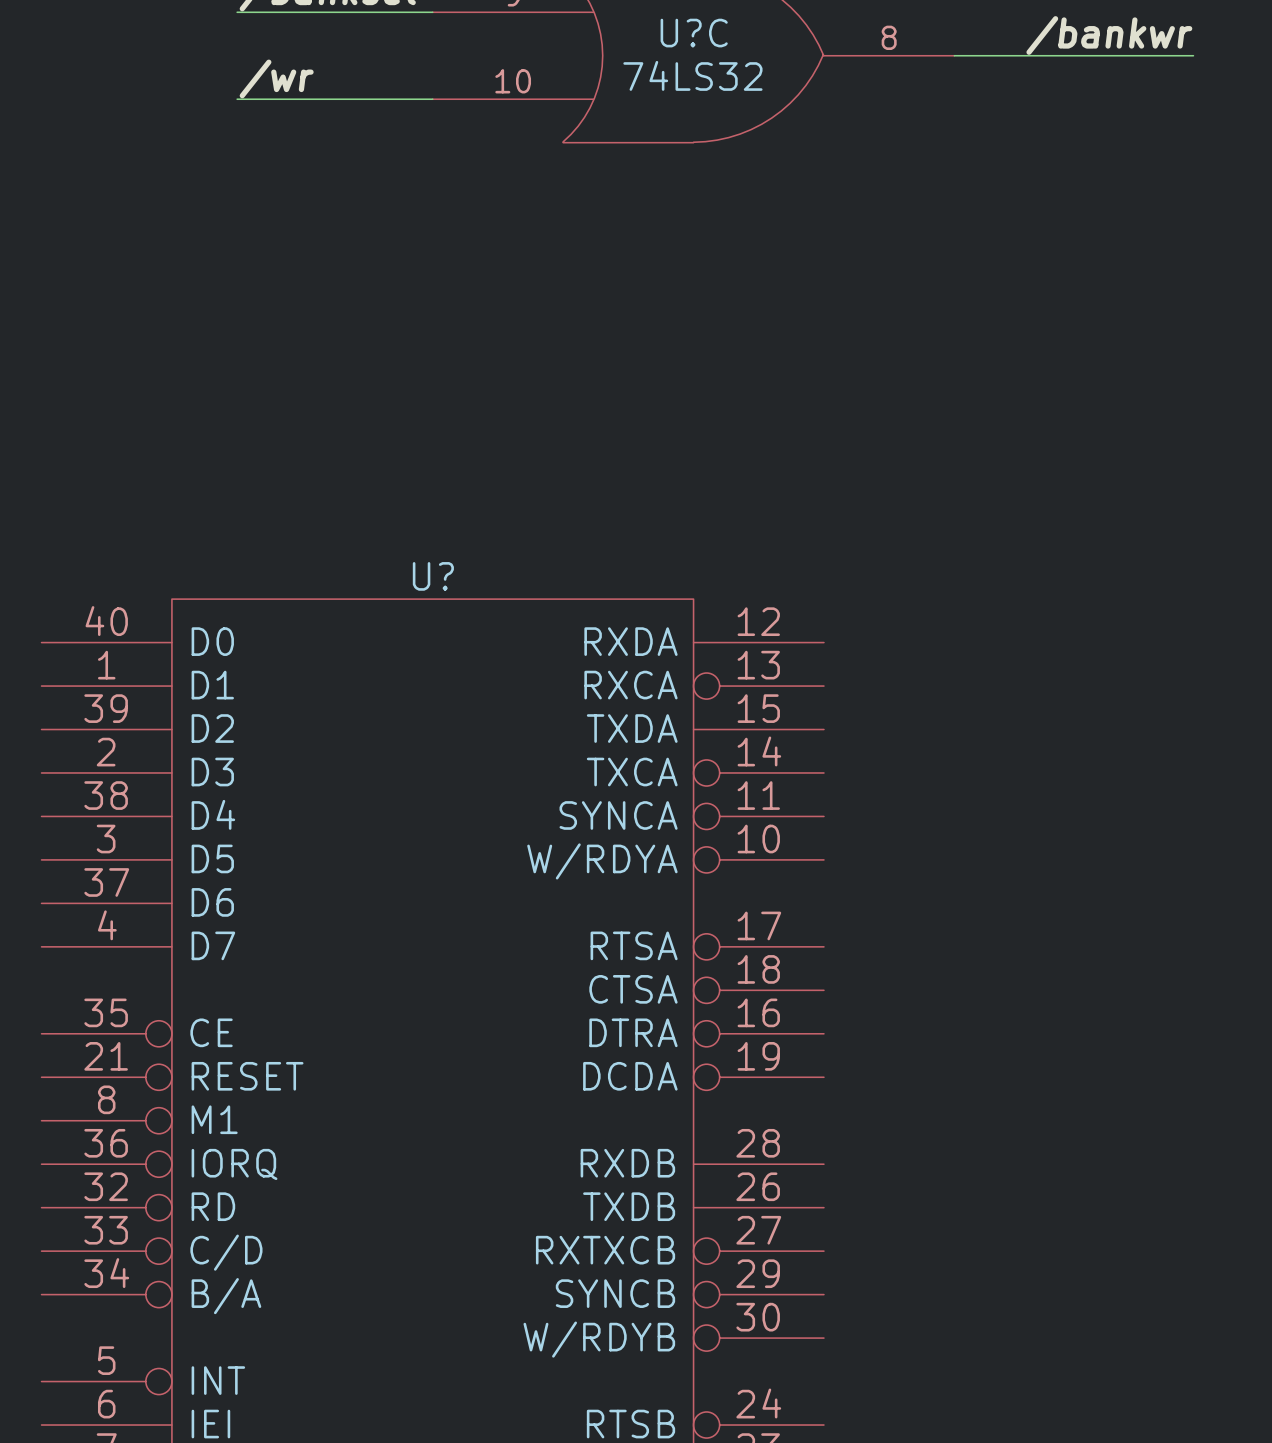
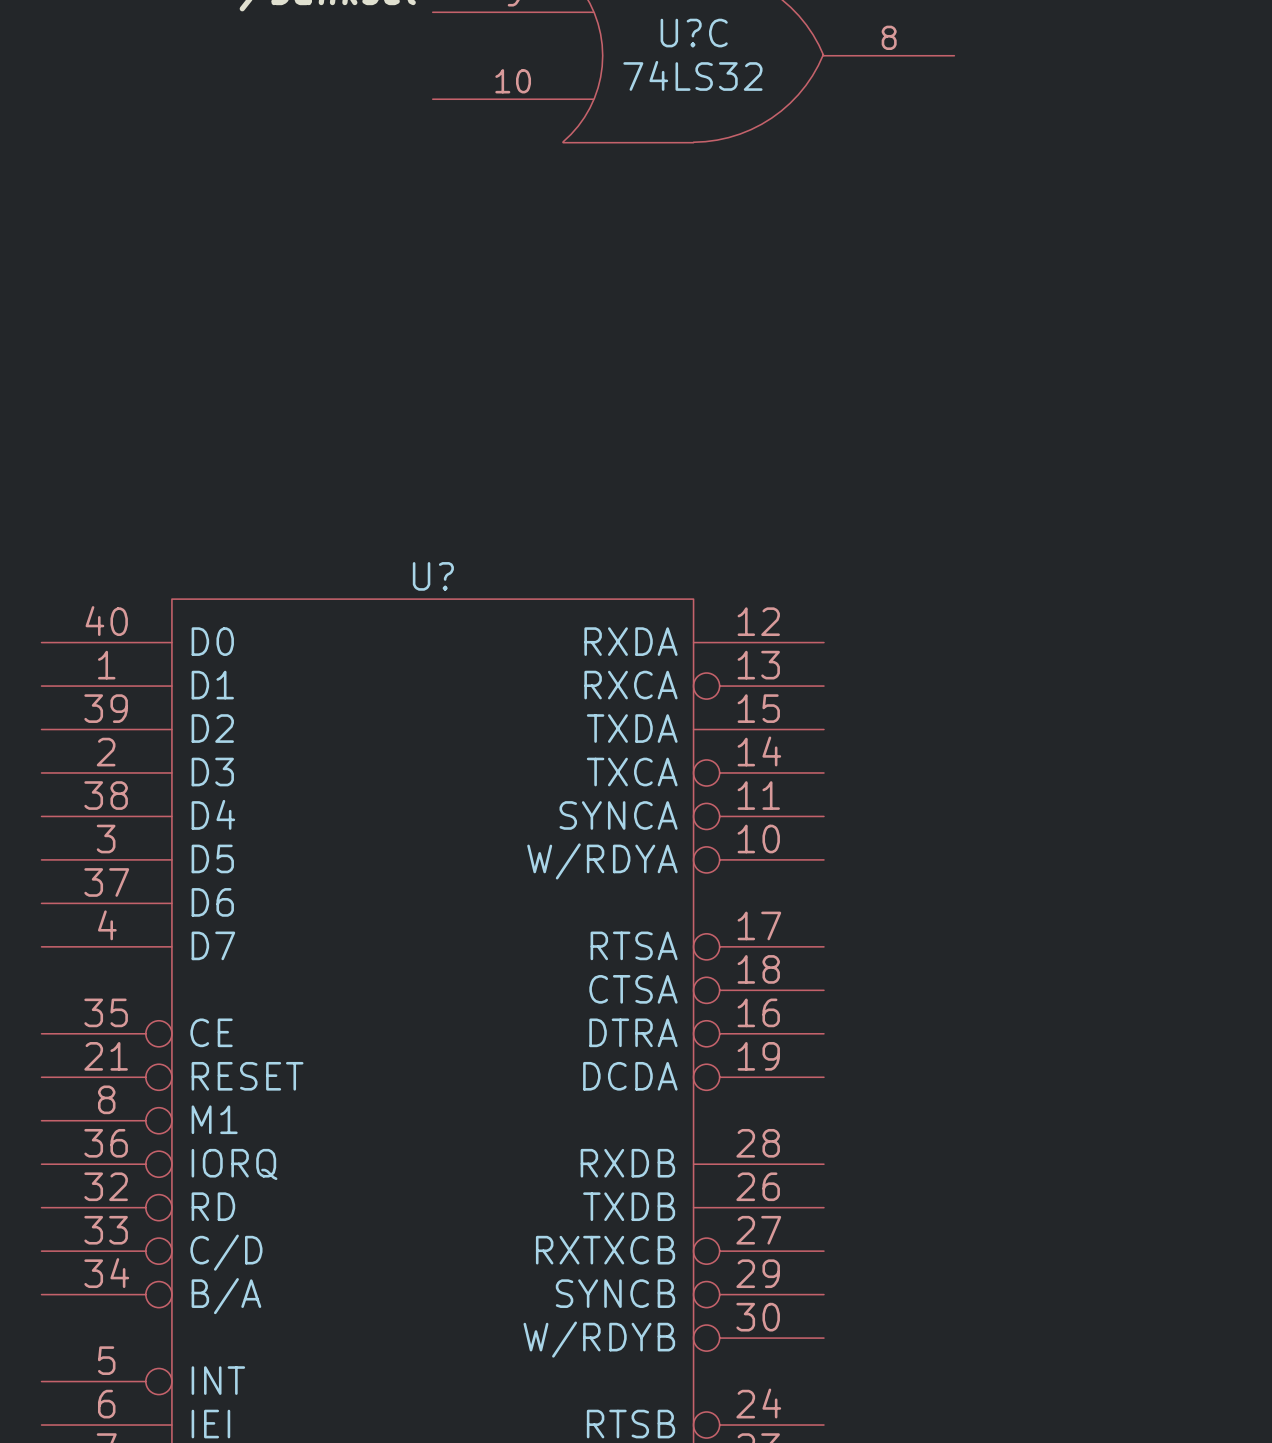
wire: (237, 12) (432, 12) -> none
label: /bankwr (1109, 35) -> none
wire: (954, 55) (1193, 55) -> none
label: /wr (276, 78) -> none
wire: (237, 99) (432, 99) -> none

